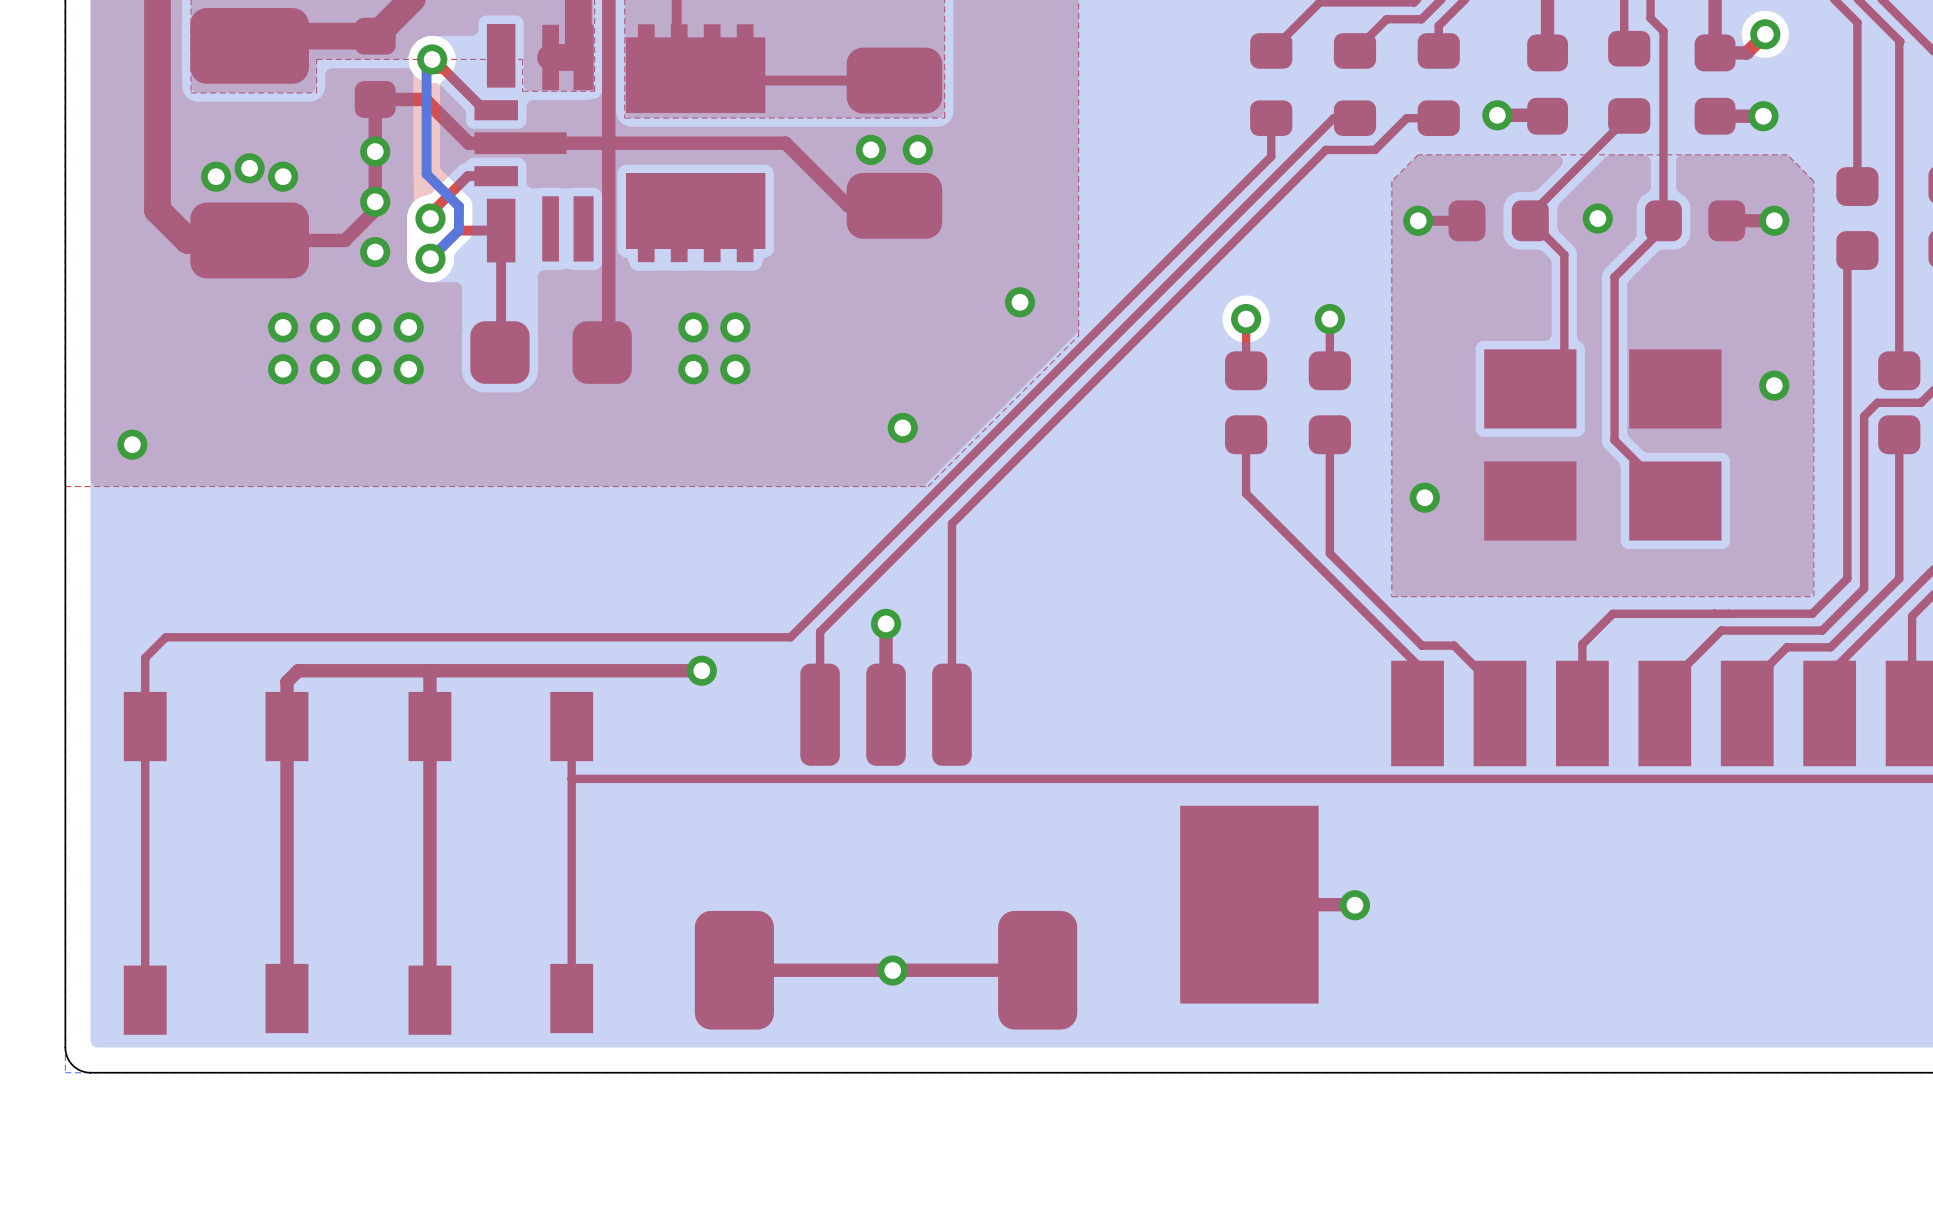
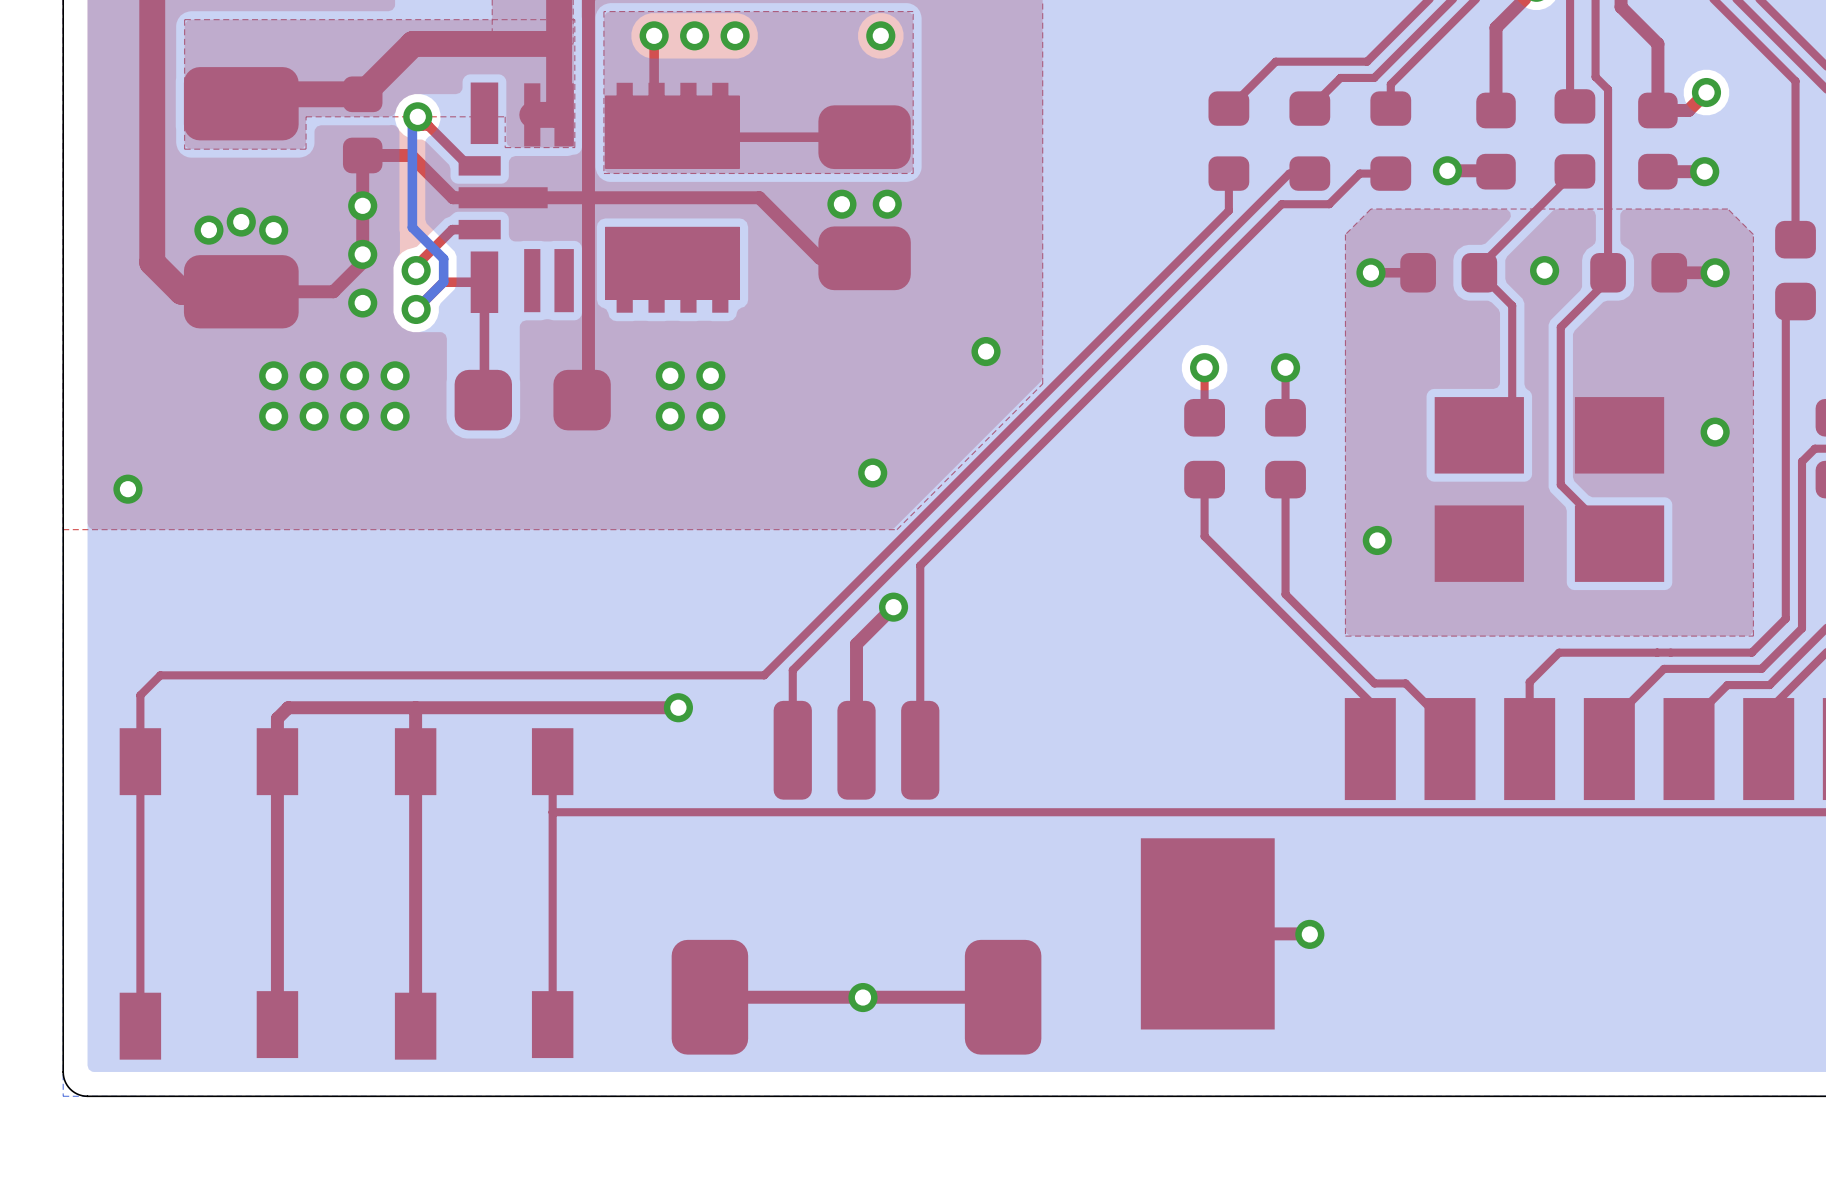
top track: none -> (893, 607) (856, 644) (856, 662)
via position: (886, 623) -> (893, 607)

